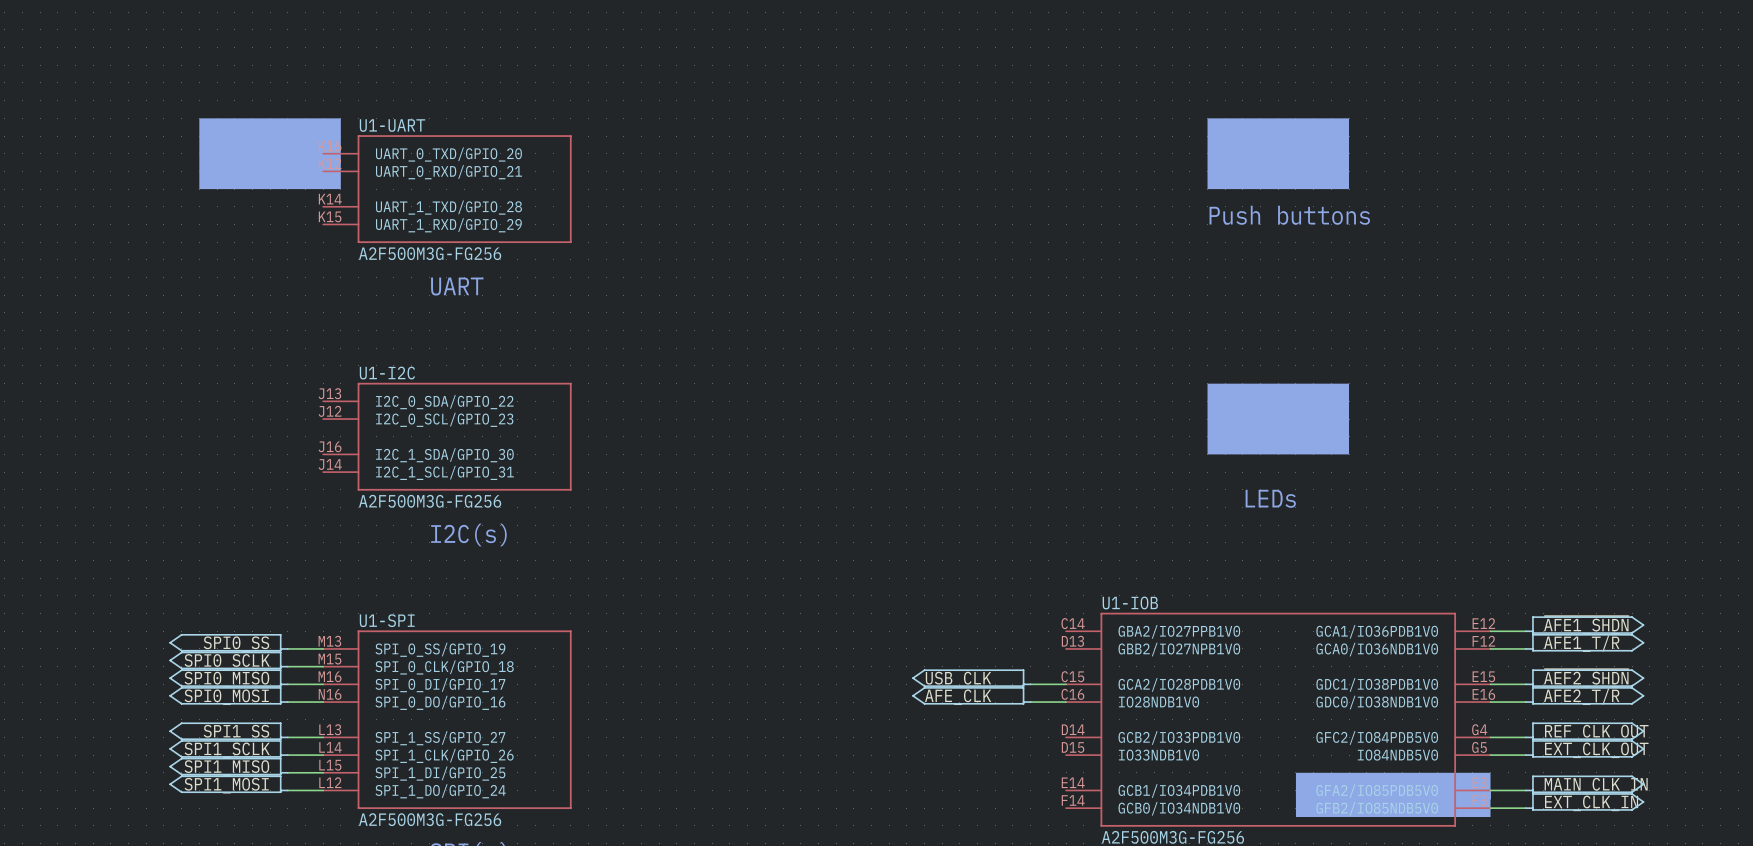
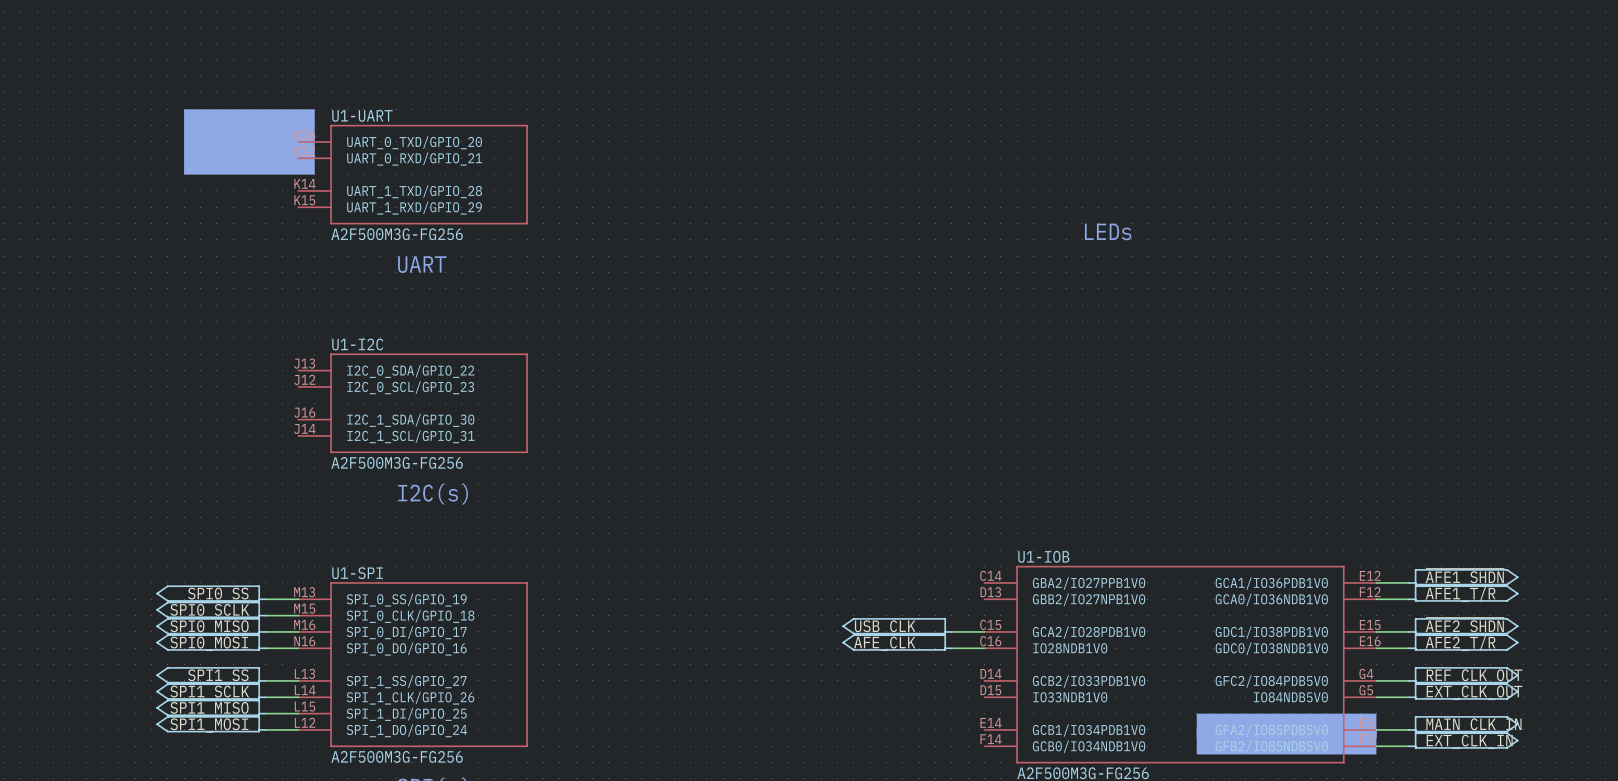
drawing: [1207, 118, 1350, 190] -> none
text: Push buttons (1289, 215) -> none
text: none -> LEDs (1108, 231)
drawing: [1207, 383, 1350, 455] -> none
text: LEDs (1270, 498) -> none

